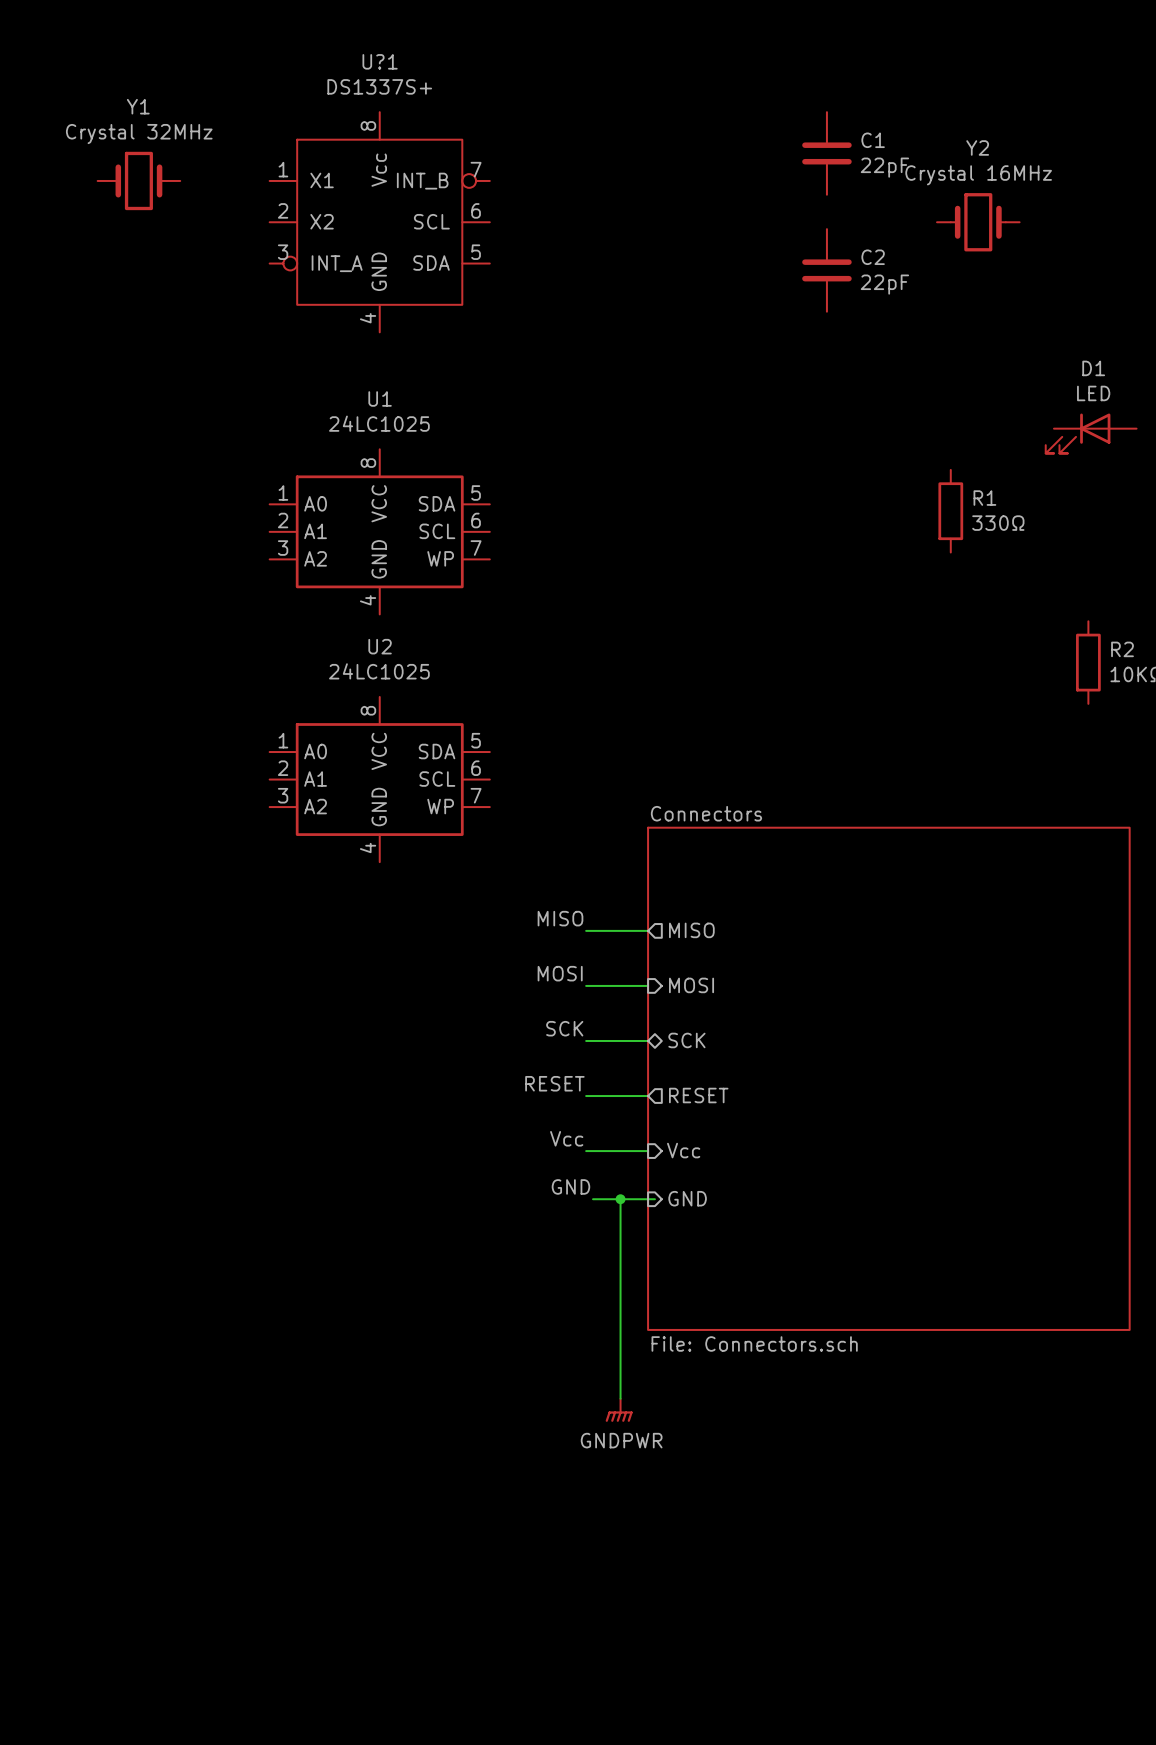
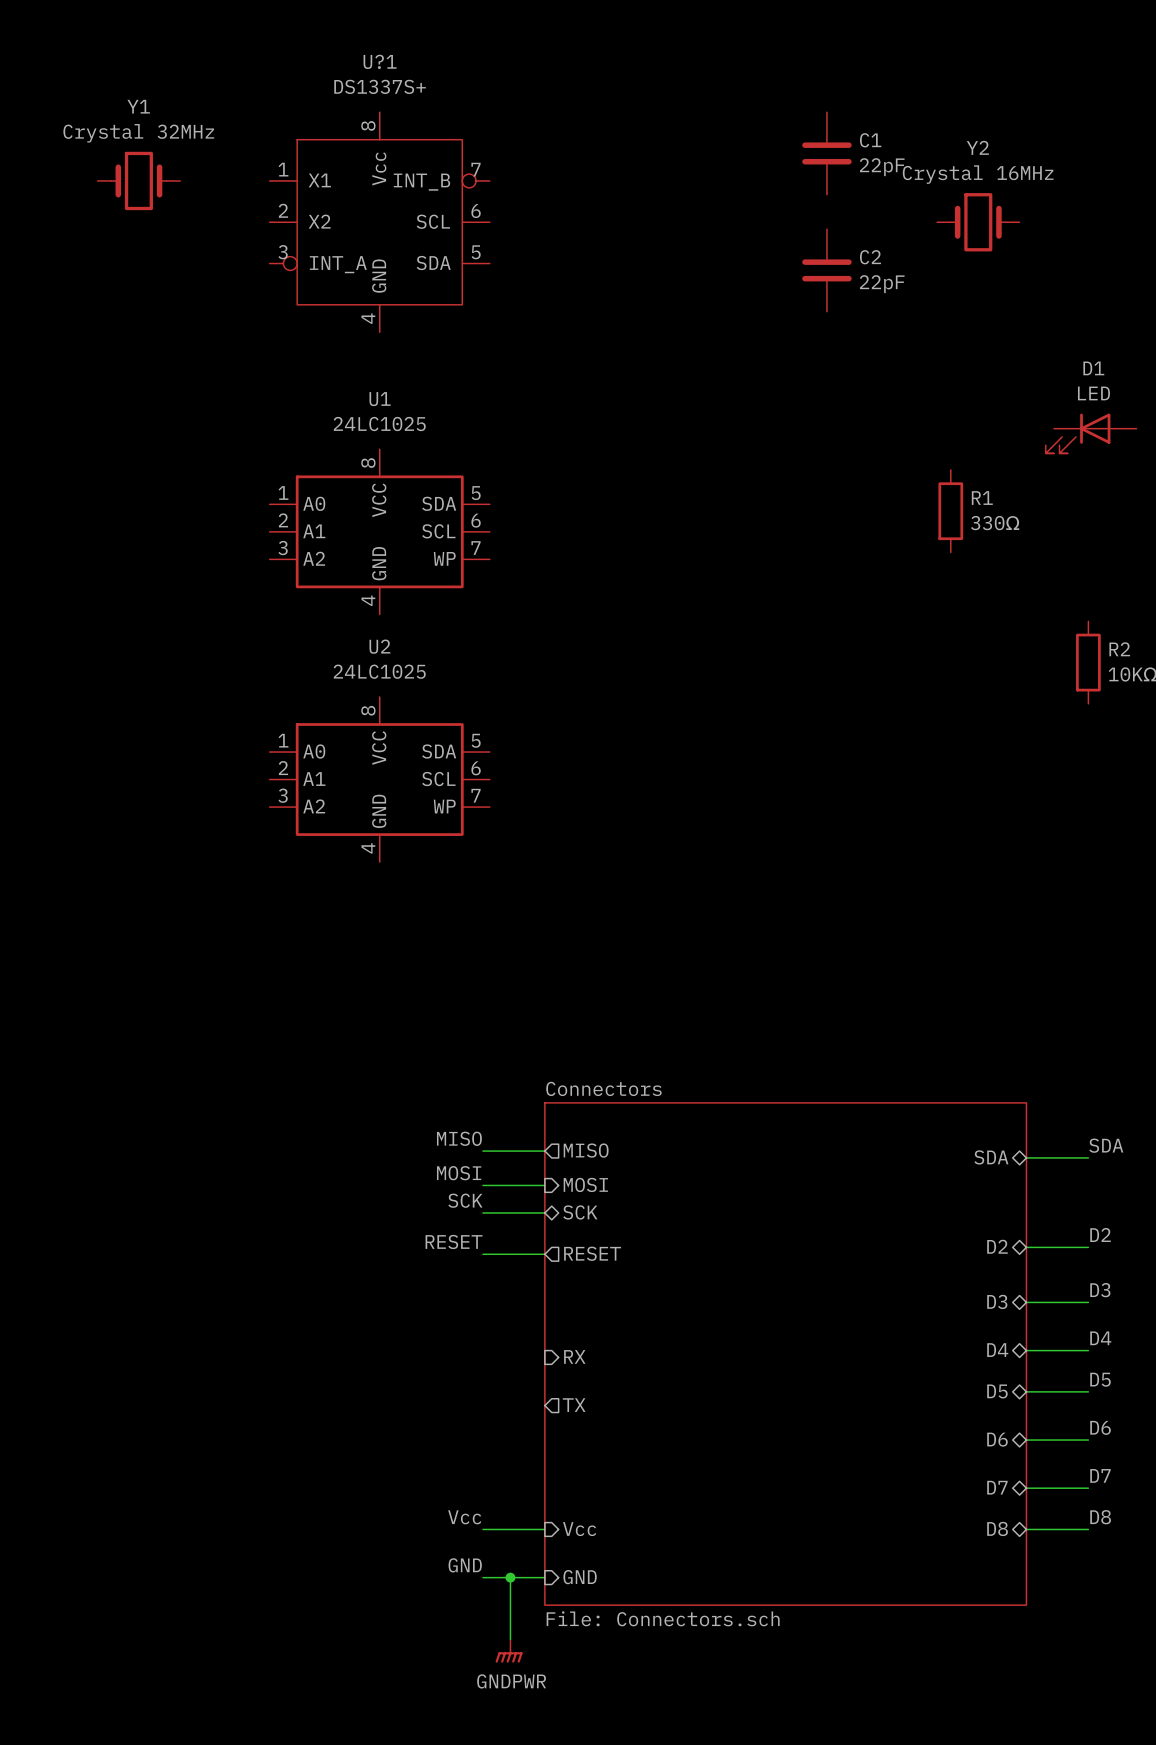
label position: MISO (560, 918) -> MISO (459, 1138)
wire: (586, 930) (648, 930) -> none
sheet pin position: MISO (691, 930) -> MISO (586, 1150)
label position: MOSI (560, 973) -> MOSI (459, 1173)
wire: (586, 985) (648, 985) -> none
sheet pin position: MOSI (691, 985) -> MOSI (585, 1184)
label position: SCK (564, 1028) -> SCK (465, 1200)
wire: (586, 1040) (648, 1040) -> (482, 1254) (544, 1254)
sheet pin position: SCK (686, 1040) -> SCK (580, 1212)
sheet Connectors: File: Connectors.sch (888, 1078) -> none
label position: RESET (554, 1083) -> RESET (454, 1241)
sheet pin position: RESET (698, 1095) -> RESET (592, 1253)
wire: (586, 1096) (648, 1096) -> (482, 1212) (544, 1212)
label: Vcc (566, 1138) -> none
label: none -> SDA (1106, 1145)
sheet pin: Vcc (683, 1150) -> none
wire: (586, 1151) (648, 1151) -> (482, 1151) (544, 1151)
sheet pin: none -> SDA (991, 1157)
wire: none -> (1026, 1157) (1088, 1157)
label: GND (570, 1186) -> none
sheet pin: GND (687, 1198) -> none
wire: (593, 1199) (654, 1199) -> (482, 1185) (544, 1185)
wire: (620, 1199) (620, 1398) -> none
junction: (620, 1199) -> none
label: none -> D2 (1100, 1234)
sheet pin: none -> D2 (997, 1246)
wire: none -> (1026, 1247) (1088, 1247)
label: none -> D3 (1100, 1290)
sheet pin: none -> D3 (997, 1301)
wire: none -> (1026, 1302) (1088, 1302)
label: none -> D4 (1100, 1338)
sheet pin: none -> D4 (997, 1350)
wire: none -> (1026, 1350) (1088, 1350)
sheet Connectors: none -> File: Connectors.sch (785, 1354)
sheet pin: none -> RX (574, 1356)
label: none -> D5 (1100, 1379)
sheet pin: none -> D5 (997, 1391)
wire: none -> (1026, 1391) (1088, 1391)
sheet pin: none -> TX (574, 1405)
power symbol position: GNDPWR (619, 1410) -> GNDPWR (509, 1651)
label: none -> D6 (1100, 1427)
sheet pin: none -> D6 (997, 1439)
wire: none -> (1026, 1440) (1088, 1440)
label: none -> D7 (1100, 1475)
sheet pin: none -> D7 (997, 1487)
wire: none -> (1026, 1488) (1088, 1488)
label: none -> Vcc (464, 1517)
label: none -> D8 (1100, 1517)
sheet pin: none -> Vcc (579, 1529)
sheet pin: none -> D8 (997, 1528)
wire: none -> (482, 1529) (544, 1529)
wire: none -> (1026, 1529) (1088, 1529)
label: none -> GND (465, 1565)
wire: none -> (482, 1577) (544, 1577)
wire: none -> (510, 1577) (510, 1639)
junction: none -> (510, 1577)
sheet pin: none -> GND (580, 1577)

